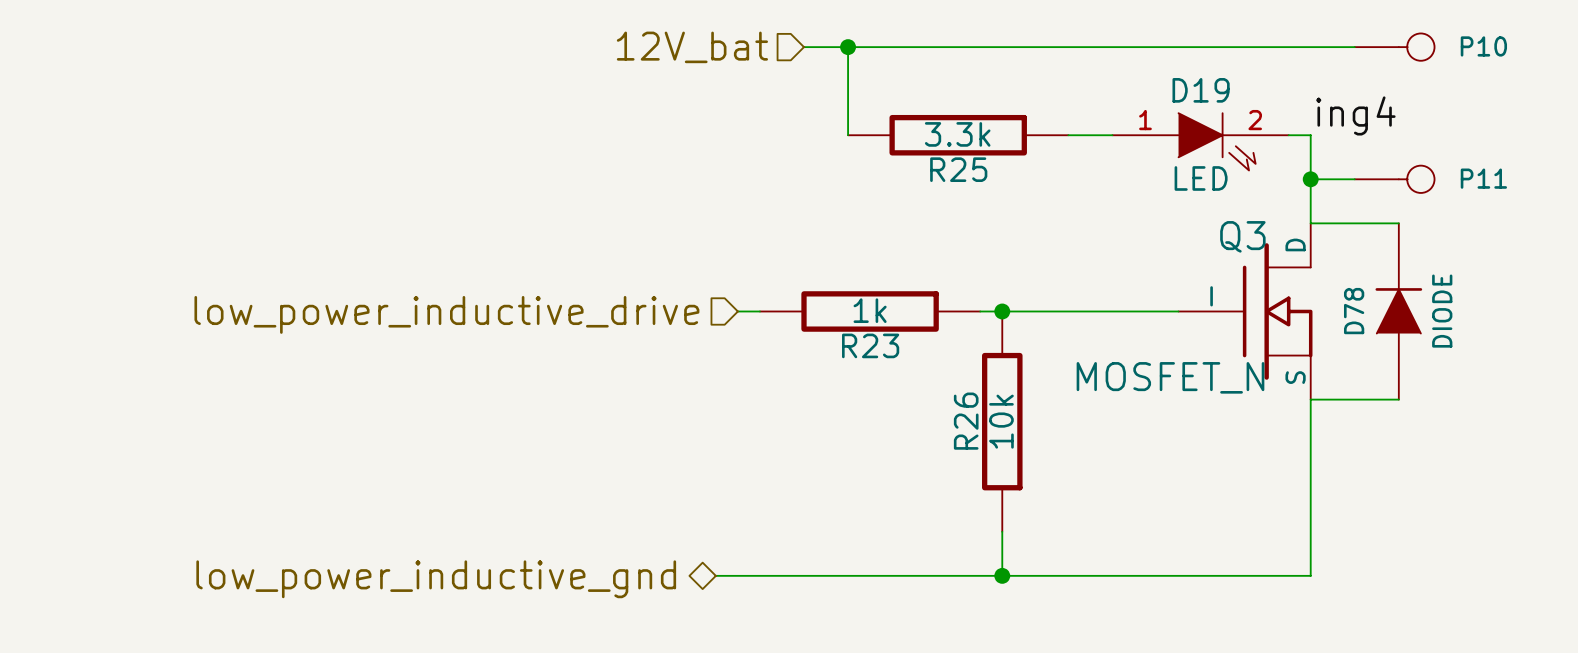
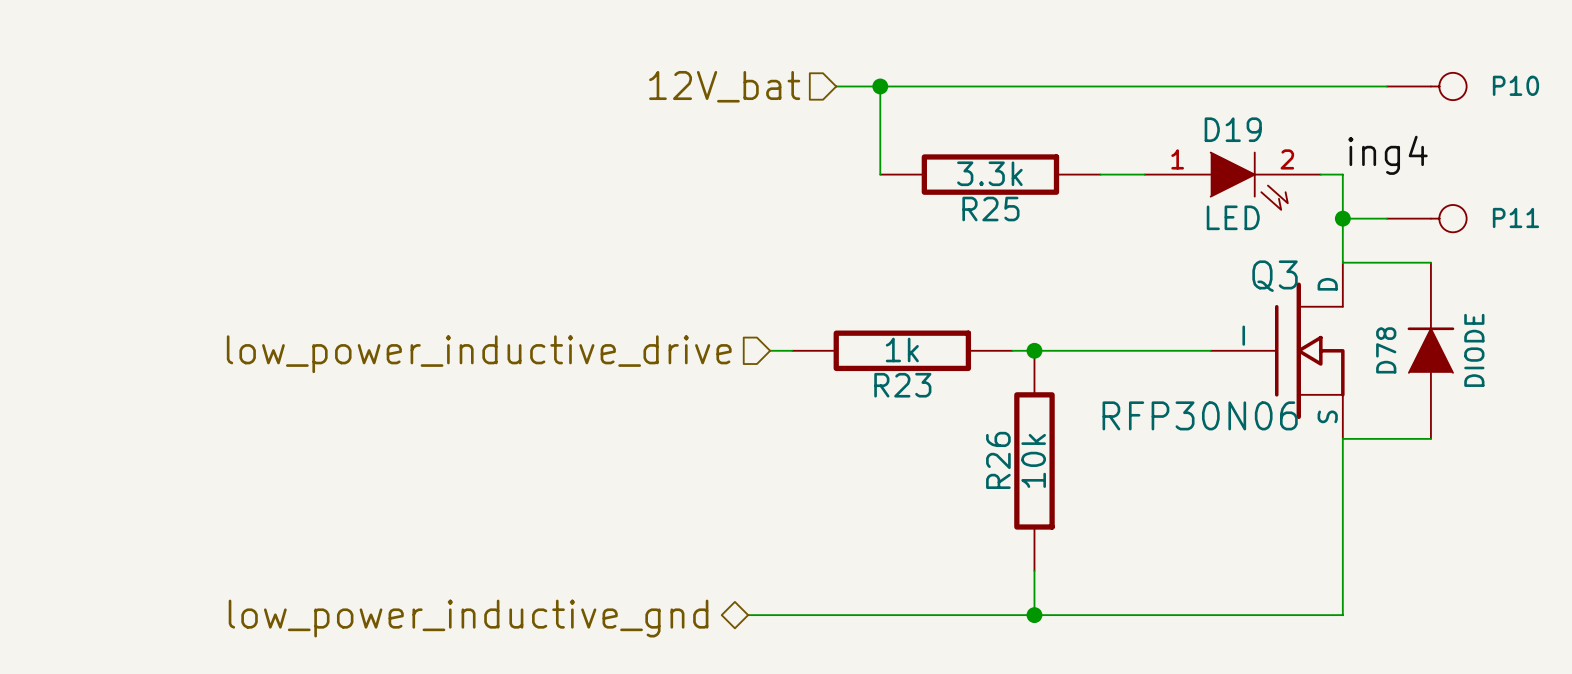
Q3 value: MOSFET_N (1170, 377) -> RFP30N06 (1200, 415)

